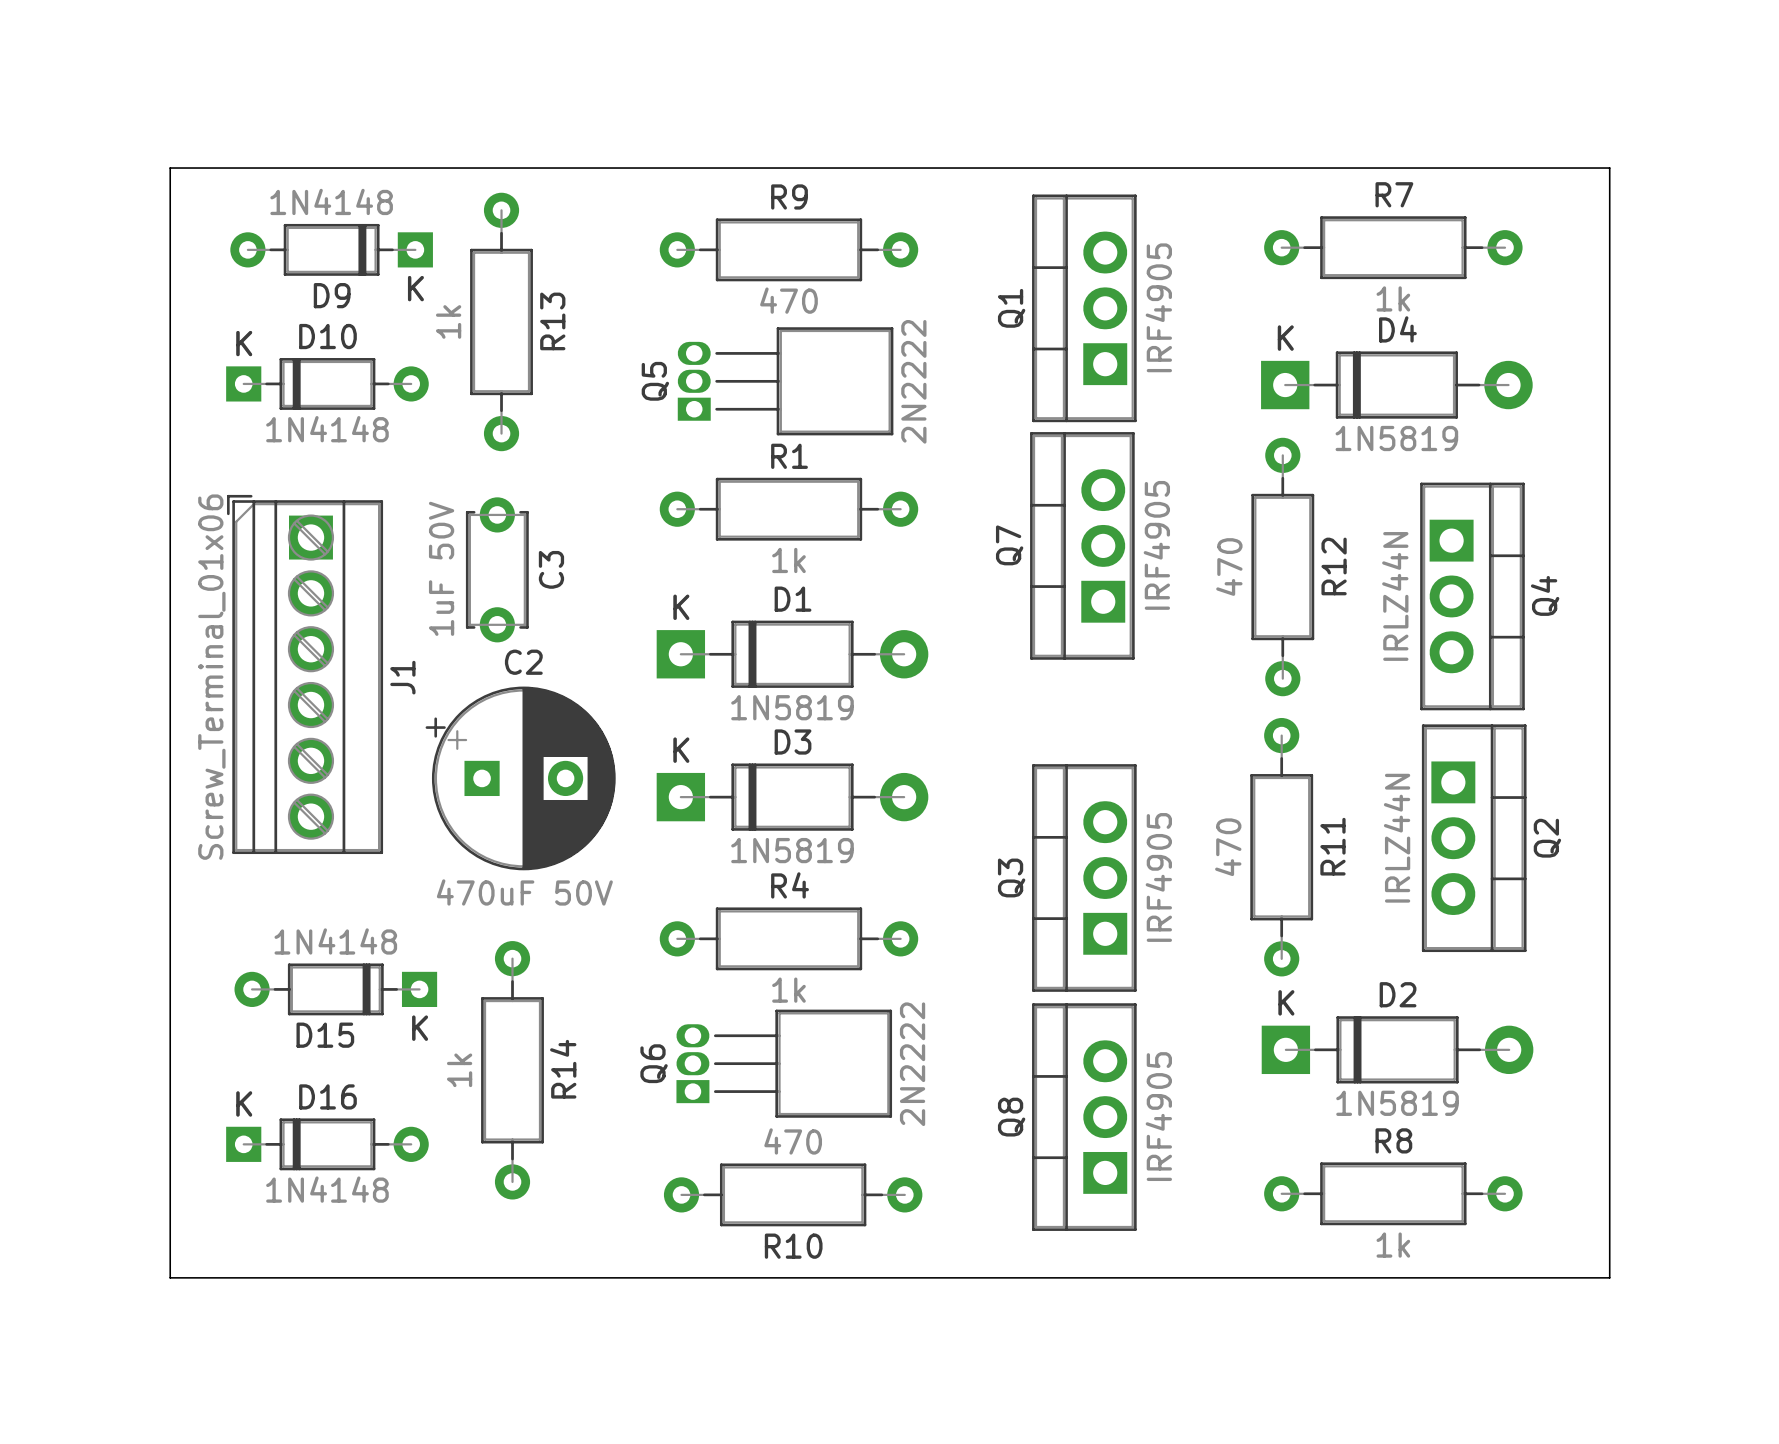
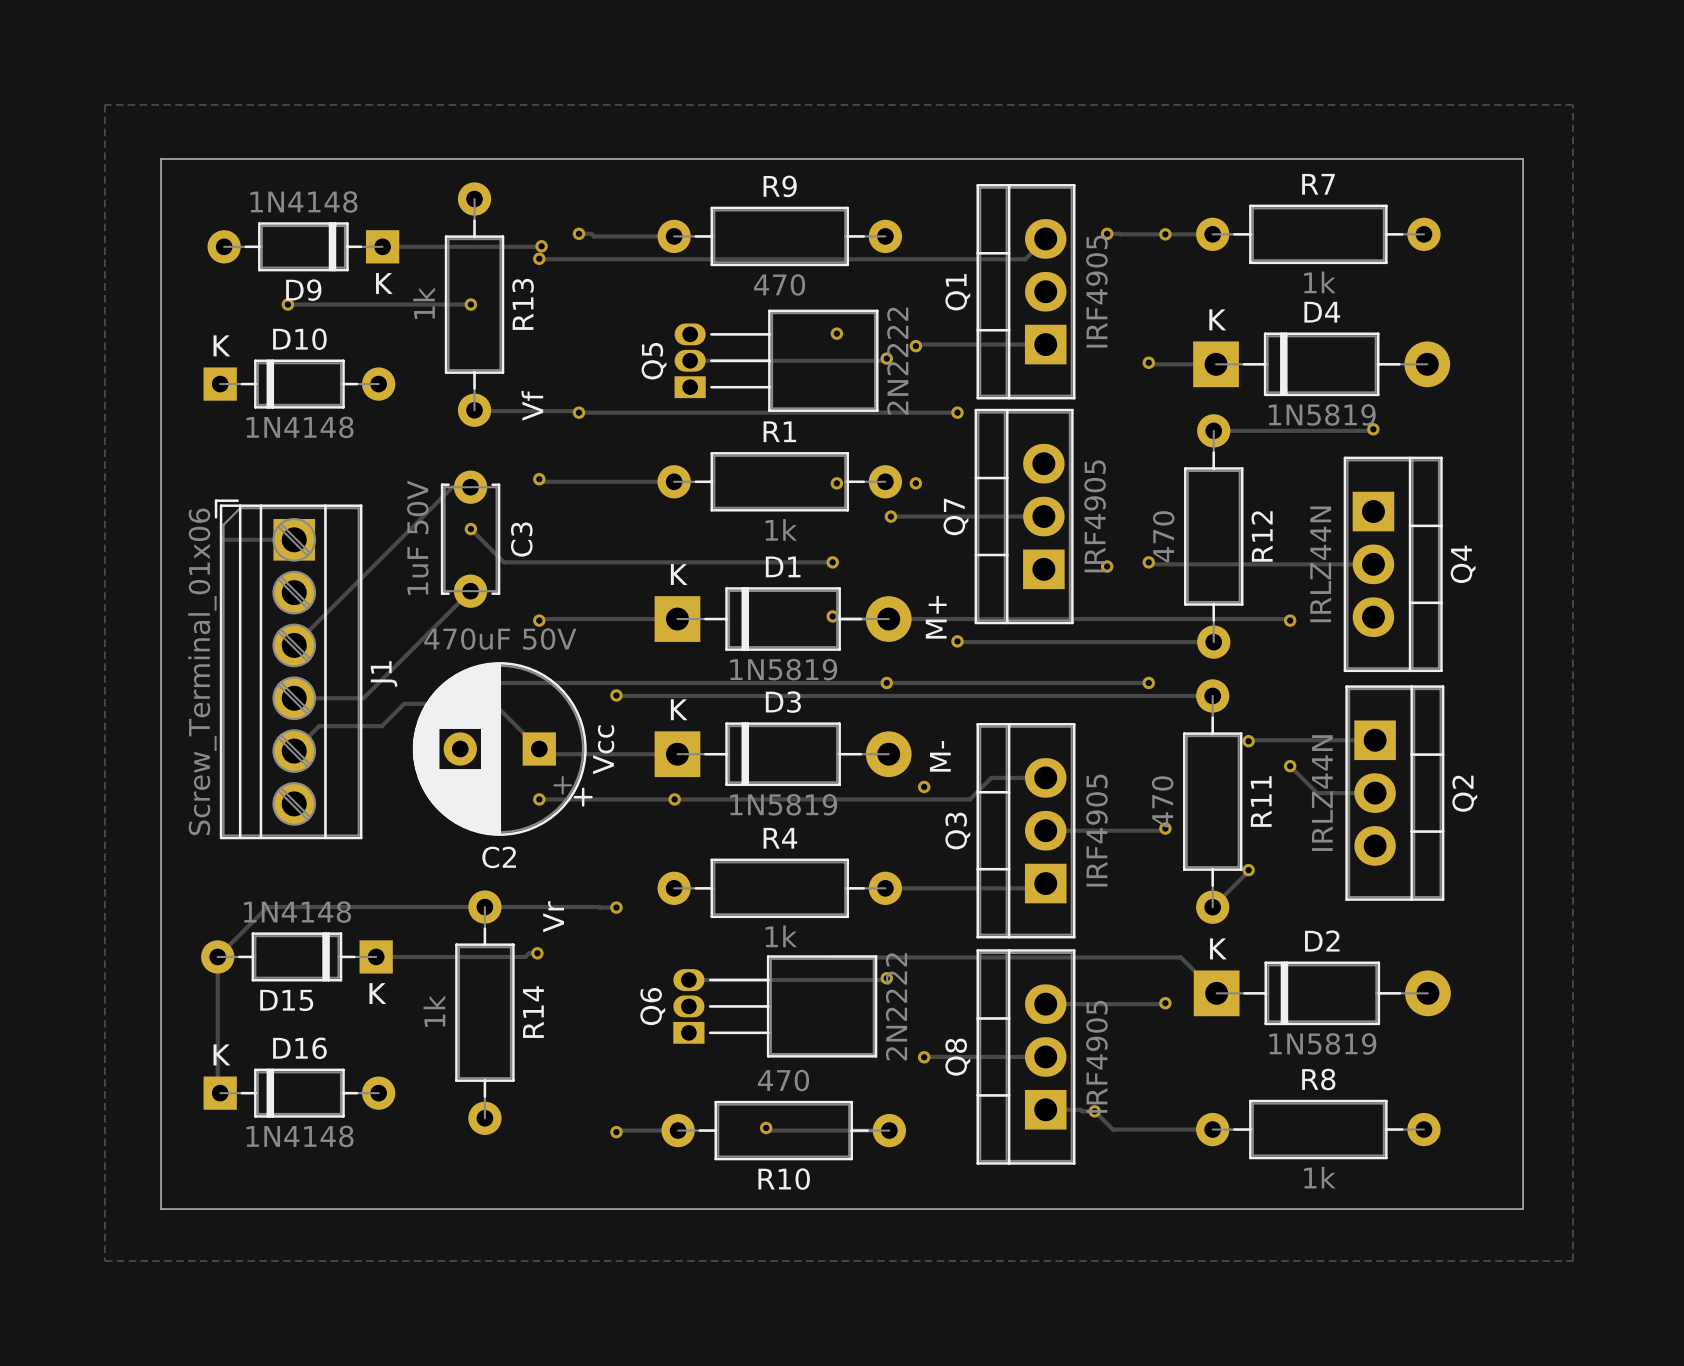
zone outline: none -> (104, 104) (104, 1261) (1572, 1261) (1572, 104) (104, 104)
track: none -> (579, 233) (591, 233) (594, 236) (674, 236)
via: none -> (579, 233)
track: none -> (1107, 233) (1212, 234)
via: none -> (1107, 233)
via: none -> (1165, 234)
D9 position: (331, 249) -> (303, 246)
R9 position: (788, 249) -> (779, 236)
track: none -> (1045, 238) (1025, 259) (539, 258)
track: none -> (541, 246) (382, 246)
via: none -> (541, 246)
via: none -> (539, 258)
track: none -> (287, 304) (470, 304)
via: none -> (287, 304)
via: none -> (470, 304)
via: none -> (836, 333)
track: none -> (1045, 344) (917, 344) (915, 346)
via: none -> (915, 346)
track: none -> (886, 358) (884, 360) (690, 360)
via: none -> (886, 358)
Q5 position: (785, 381) -> (776, 360)
D10 position: (327, 383) -> (299, 384)
track: none -> (1148, 362) (1150, 364) (1216, 364)
via: none -> (1148, 362)
text: none -> Vf (532, 405)
track: none -> (474, 411) (957, 412)
via: none -> (579, 412)
via: none -> (957, 412)
track: none -> (1373, 429) (1371, 430) (1213, 430)
via: none -> (1373, 429)
track: none -> (539, 479) (541, 481) (674, 481)
via: none -> (539, 479)
R1 position: (788, 509) -> (779, 481)
via: none -> (836, 483)
via: none -> (915, 483)
track: none -> (470, 487) (452, 487) (294, 645)
track: none -> (891, 516) (1043, 516)
via: none -> (890, 516)
track: none -> (470, 529) (504, 562) (832, 562)
via: none -> (470, 529)
track: none -> (221, 537) (223, 539) (294, 539)
via: none -> (832, 562)
track: none -> (1148, 562) (1150, 564) (1373, 564)
via: none -> (1148, 562)
via: none -> (1107, 566)
track: none -> (470, 591) (363, 698) (294, 698)
text: none -> M+ (936, 617)
track: none -> (832, 616) (835, 619) (1288, 619) (1290, 620)
via: none -> (832, 616)
track: none -> (677, 619) (540, 619) (539, 620)
D1 position: (792, 654) -> (783, 619)
via: none -> (539, 620)
via: none -> (1290, 620)
J1 position: (305, 674) -> (288, 669)
track: none -> (957, 641) (1213, 642)
via: none -> (957, 641)
track: none -> (470, 682) (1148, 682)
via: none -> (886, 682)
via: none -> (1148, 682)
track: none -> (616, 695) (1212, 695)
via: none -> (616, 695)
C2 rotation: 0° (520, 778) -> 180° (502, 749)
track: none -> (1375, 740) (1248, 741)
via: none -> (1248, 741)
text: none -> Vcc (603, 749)
text: none -> M- (940, 756)
track: none -> (294, 751) (319, 726) (381, 726) (404, 703) (494, 703) (544, 754) (677, 754)
D3 position: (792, 797) -> (783, 754)
track: none -> (1290, 766) (1317, 793) (1375, 793)
via: none -> (1290, 766)
track: none -> (1045, 777) (991, 777) (969, 799) (539, 799)
via: none -> (924, 786)
via: none -> (539, 799)
via: none -> (674, 799)
track: none -> (1165, 828) (1163, 830) (1045, 830)
via: none -> (1165, 828)
track: none -> (1248, 870) (1212, 907)
via: none -> (1248, 870)
track: none -> (1045, 883) (1040, 888) (885, 888)
R4 position: (788, 938) -> (779, 888)
track: none -> (616, 907) (267, 907) (217, 956) (217, 1090) (220, 1093)
via: none -> (616, 907)
text: none -> Vr (553, 916)
D15 position: (335, 989) -> (296, 956)
track: none -> (537, 953) (529, 953) (525, 956) (376, 956)
via: none -> (537, 953)
track: none -> (832, 957) (1180, 957) (1216, 993)
track: none -> (886, 978) (884, 980) (688, 980)
via: none -> (886, 978)
track: none -> (1165, 1003) (1045, 1004)
via: none -> (1165, 1003)
Q6 position: (784, 1063) -> (775, 1006)
via: none -> (924, 1057)
track: none -> (1045, 1056) (924, 1057)
D16 position: (327, 1144) -> (299, 1093)
track: none -> (1045, 1109) (1094, 1111) (1112, 1129) (1212, 1129)
via: none -> (1094, 1111)
track: none -> (766, 1127) (768, 1130) (889, 1130)
via: none -> (766, 1127)
track: none -> (678, 1130) (618, 1130) (616, 1132)
R10 position: (793, 1194) -> (783, 1130)
via: none -> (616, 1132)

